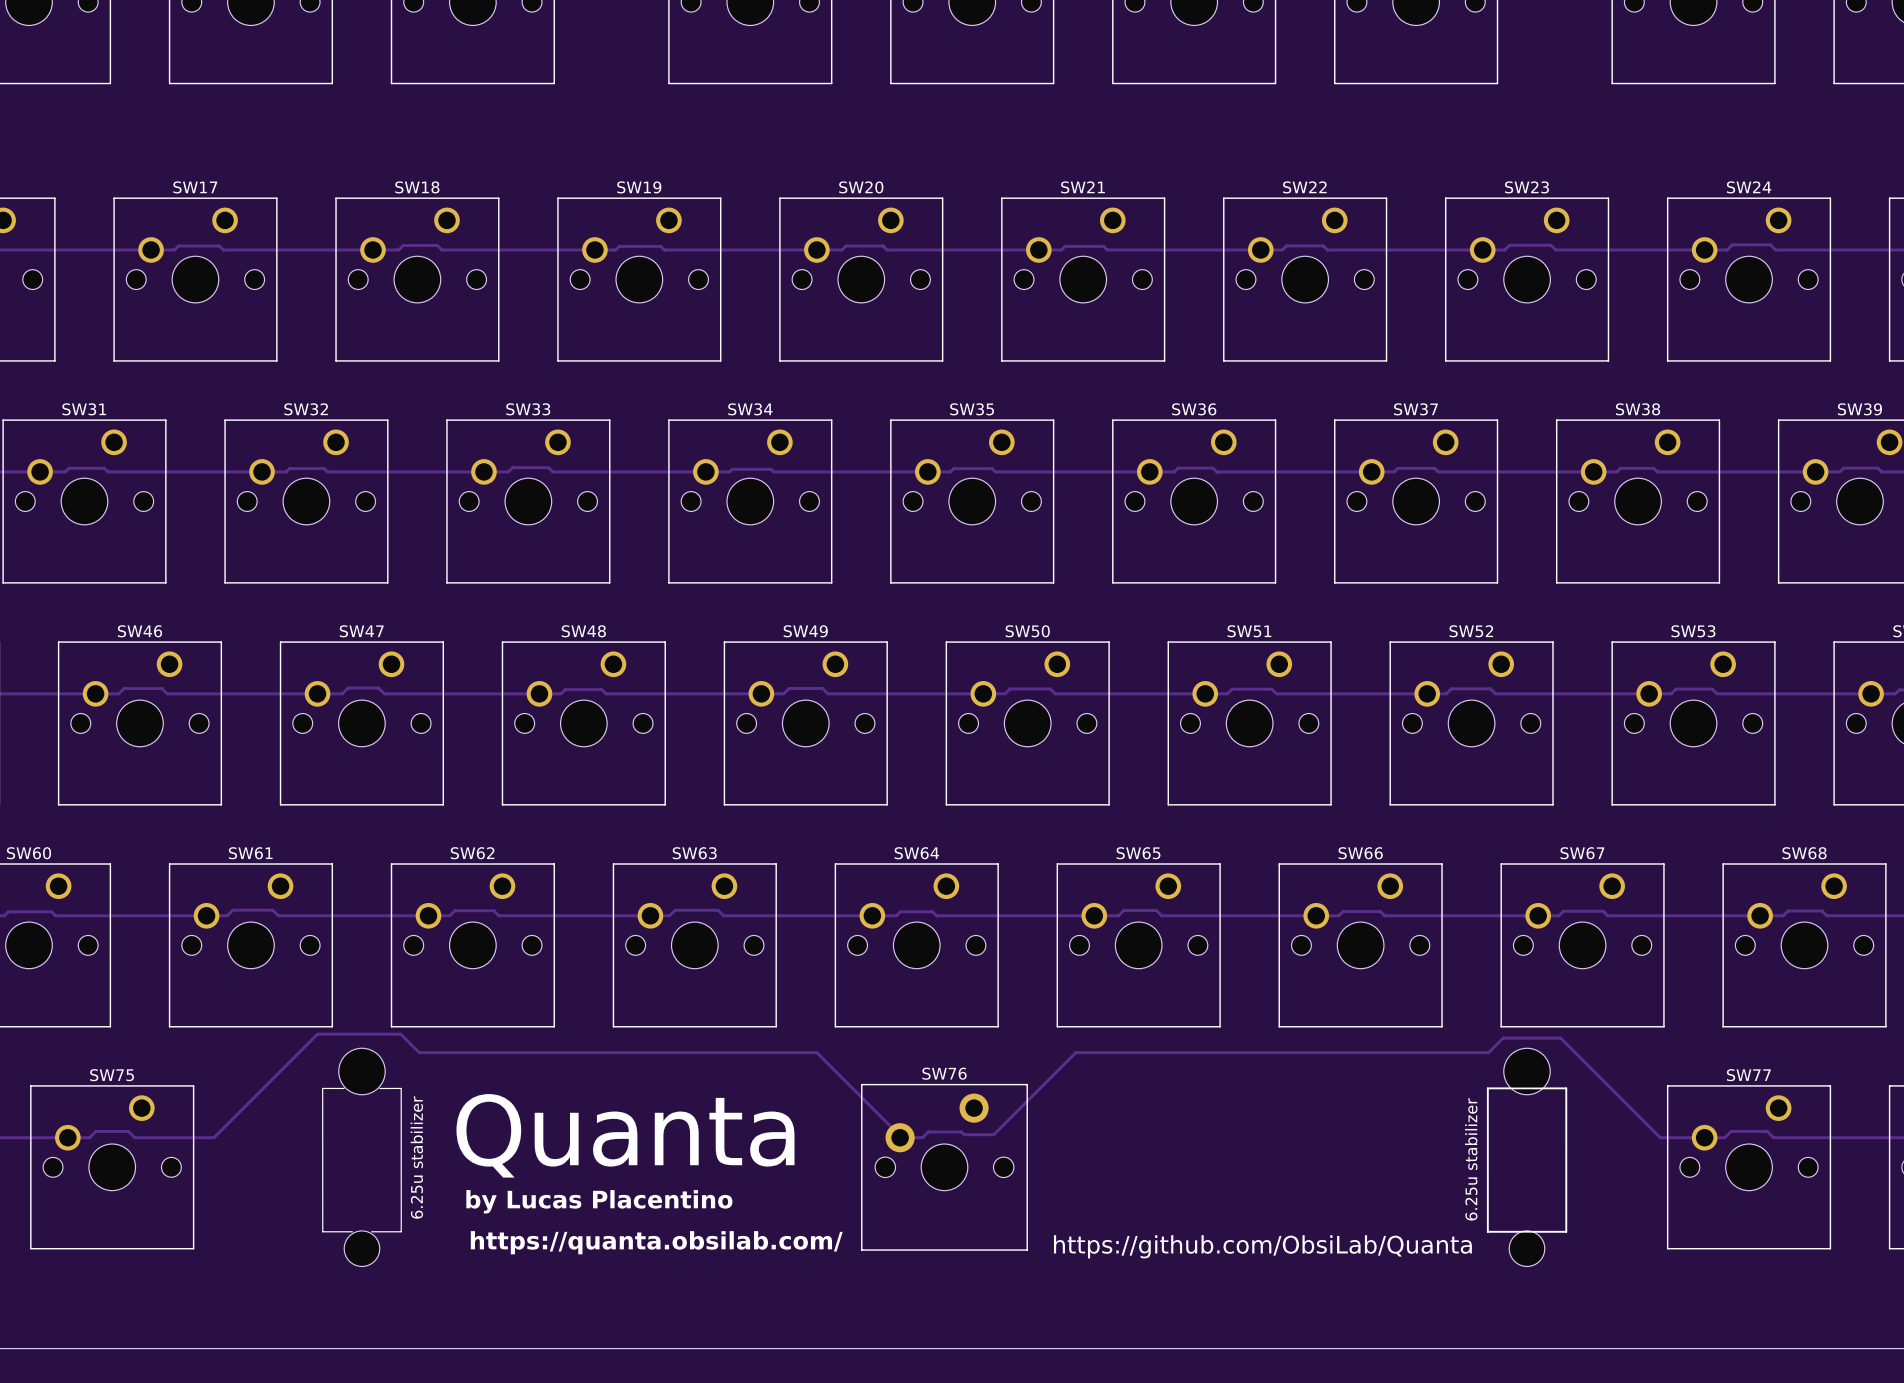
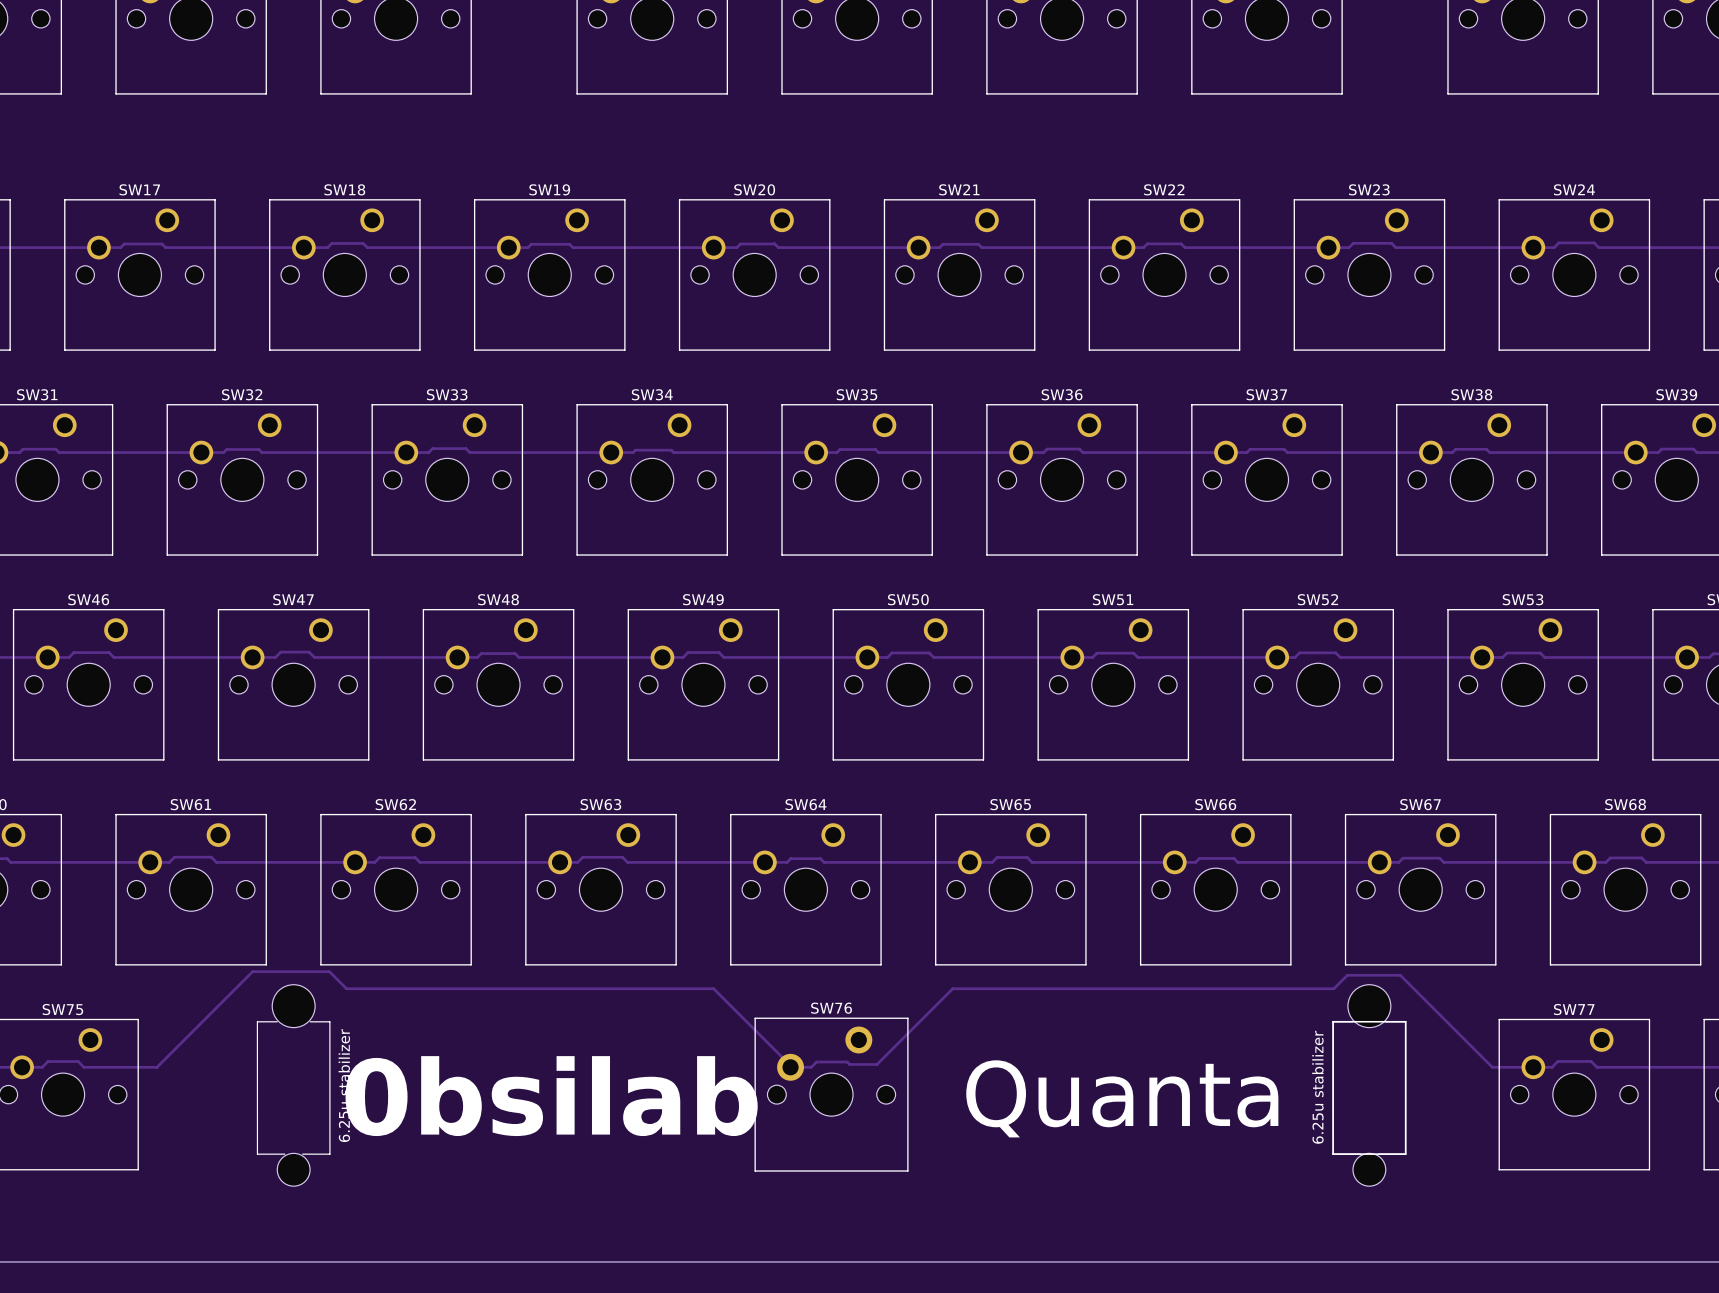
text: Quanta (625, 1135) -> none
text: none -> 0bsilab (551, 1096)
text: none -> Quanta (1122, 1098)
text: by Lucas Placentino (599, 1201) -> none
text: https://quanta.obsilab.com/ (656, 1242) -> none
text: https://github.com/ObsiLab/Quanta (1262, 1246) -> none

